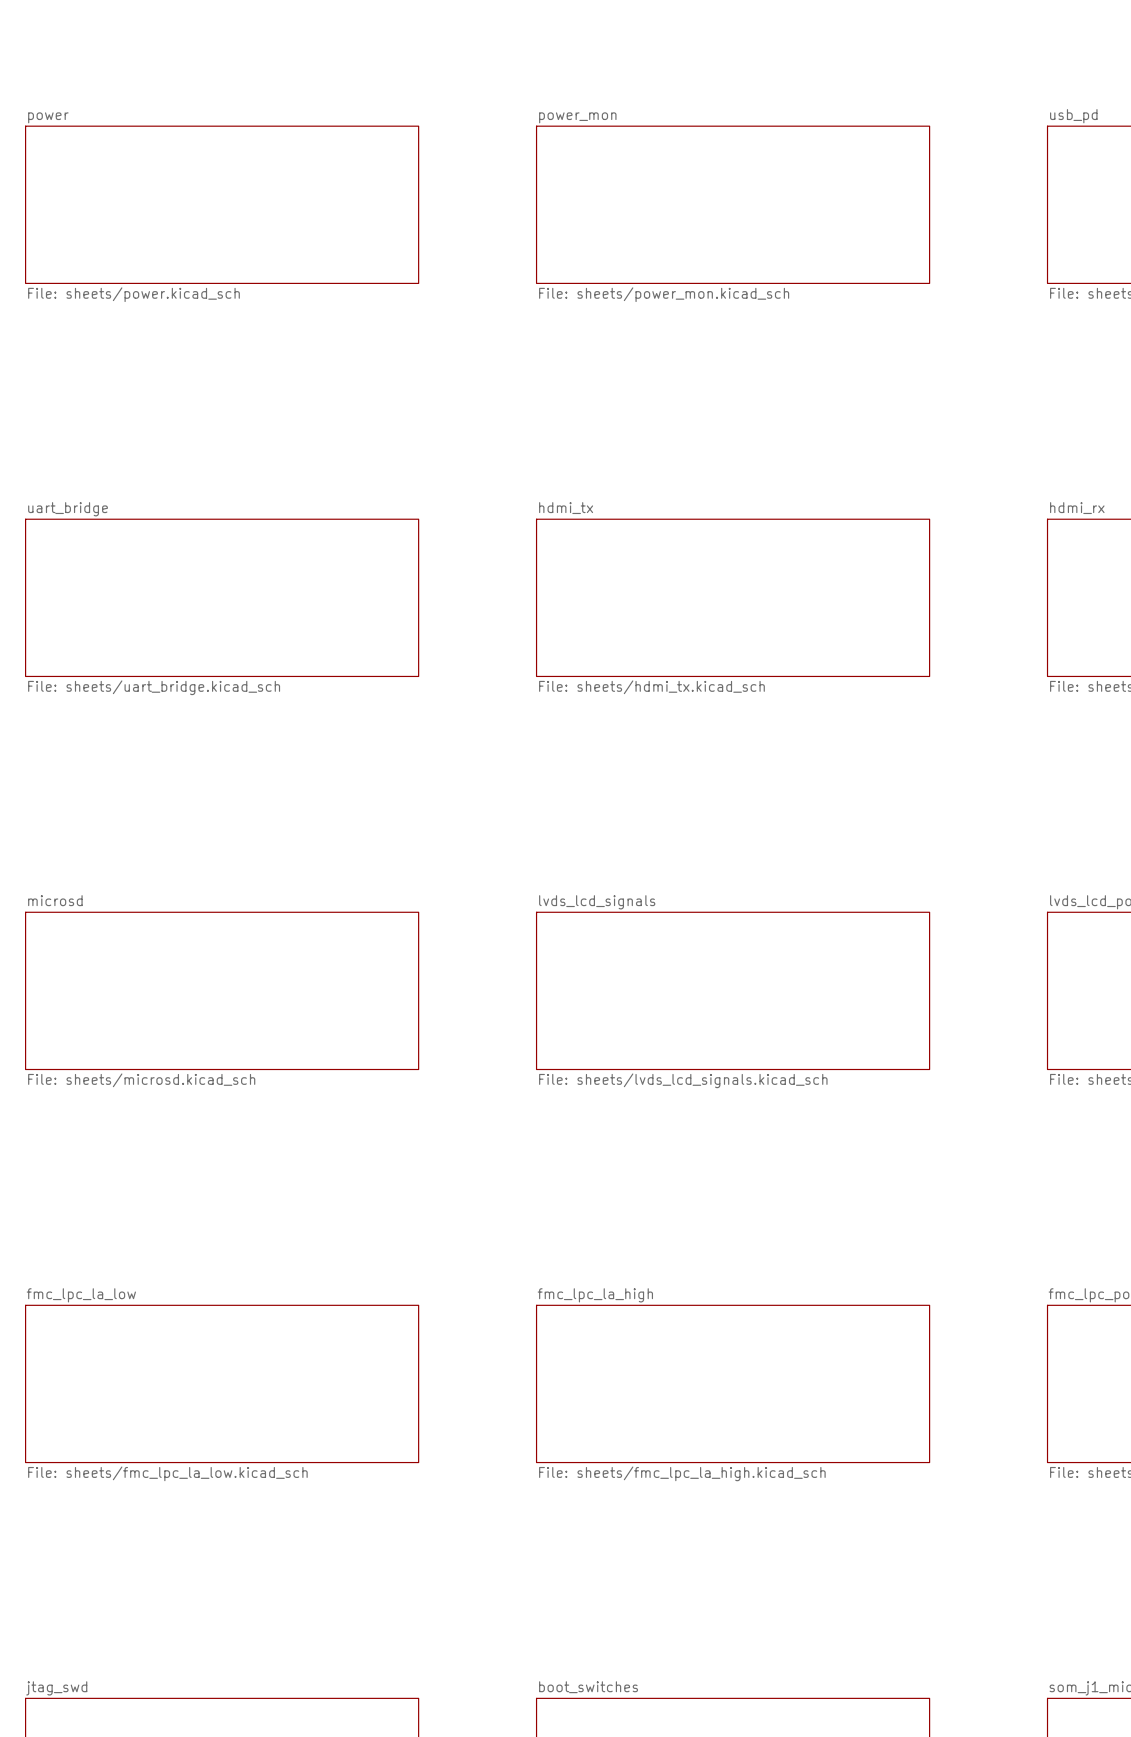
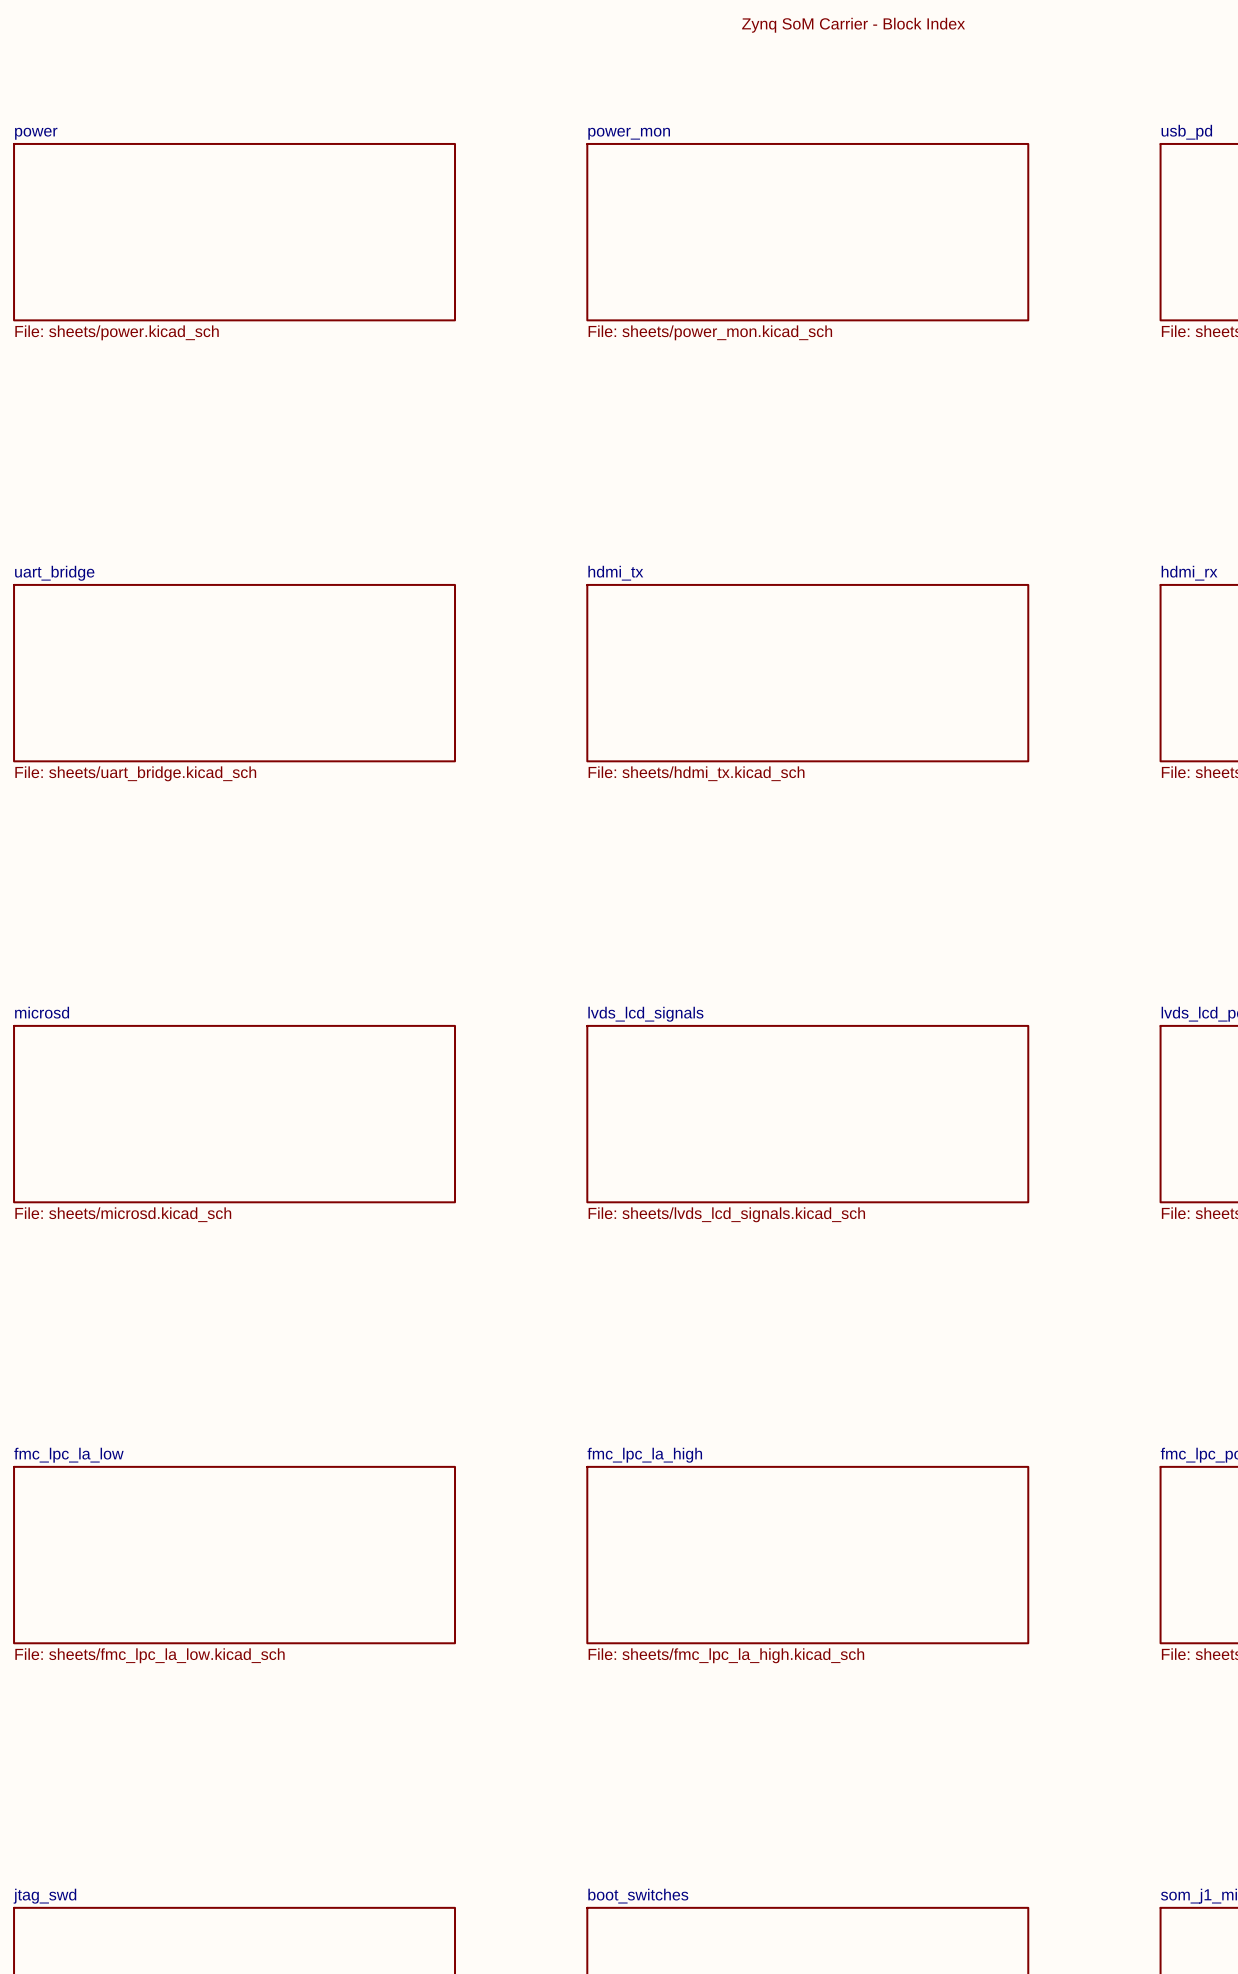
label: none -> Zynq SoM Carrier - Block Index (853, 25)

